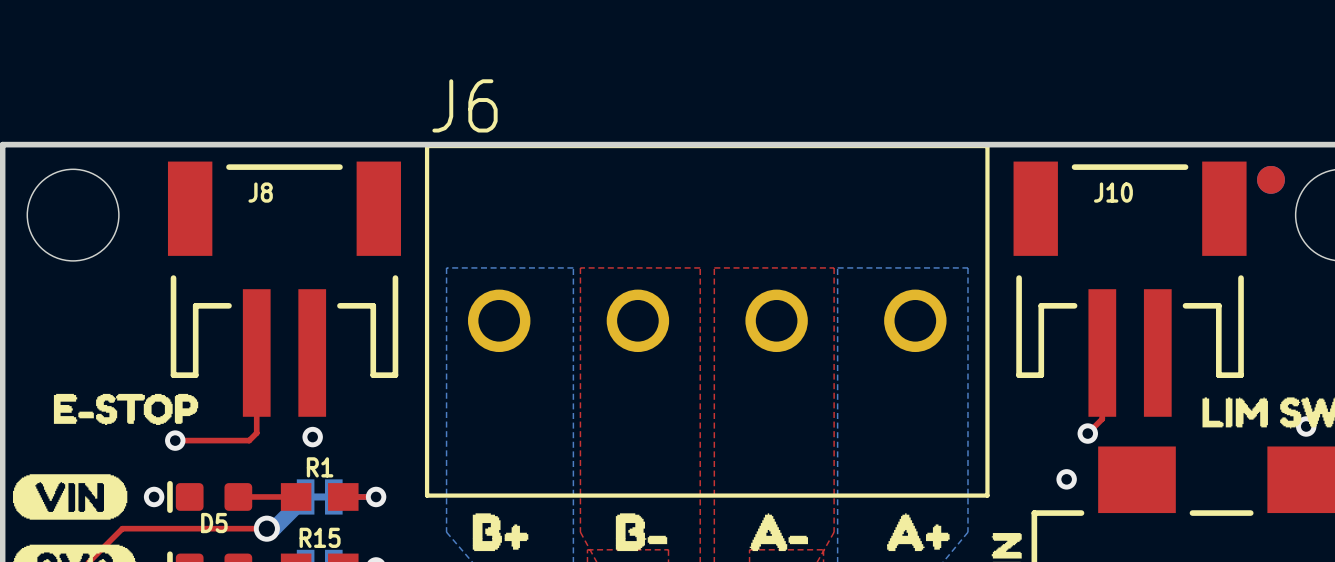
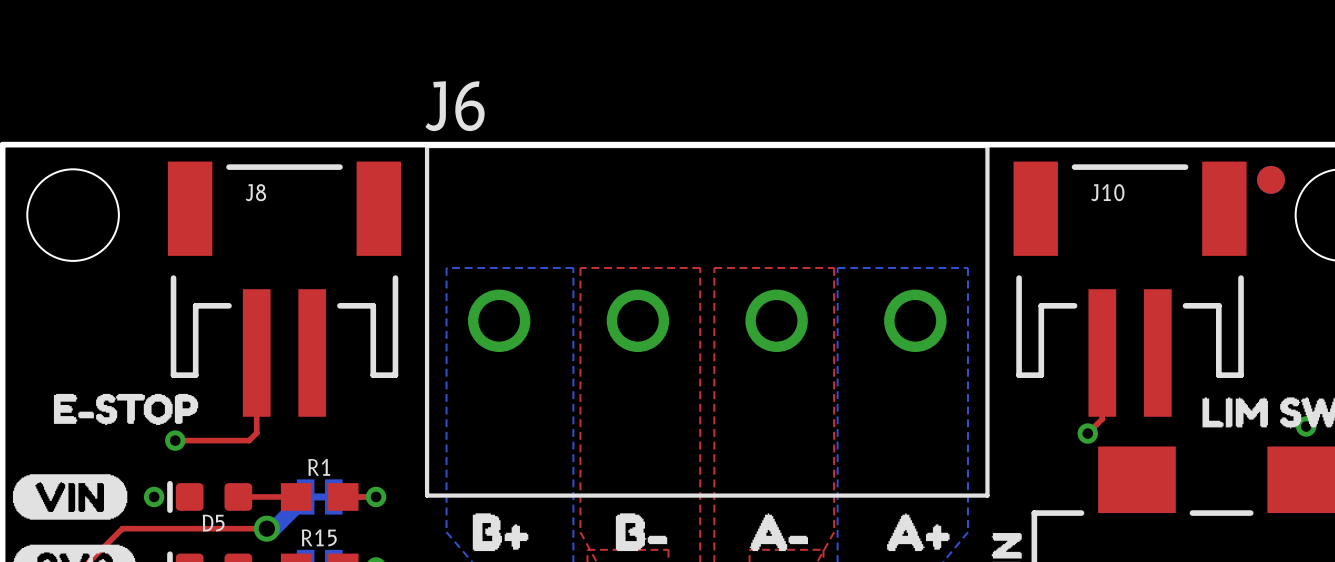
via: (312, 437) -> none
via: (1066, 479) -> none

